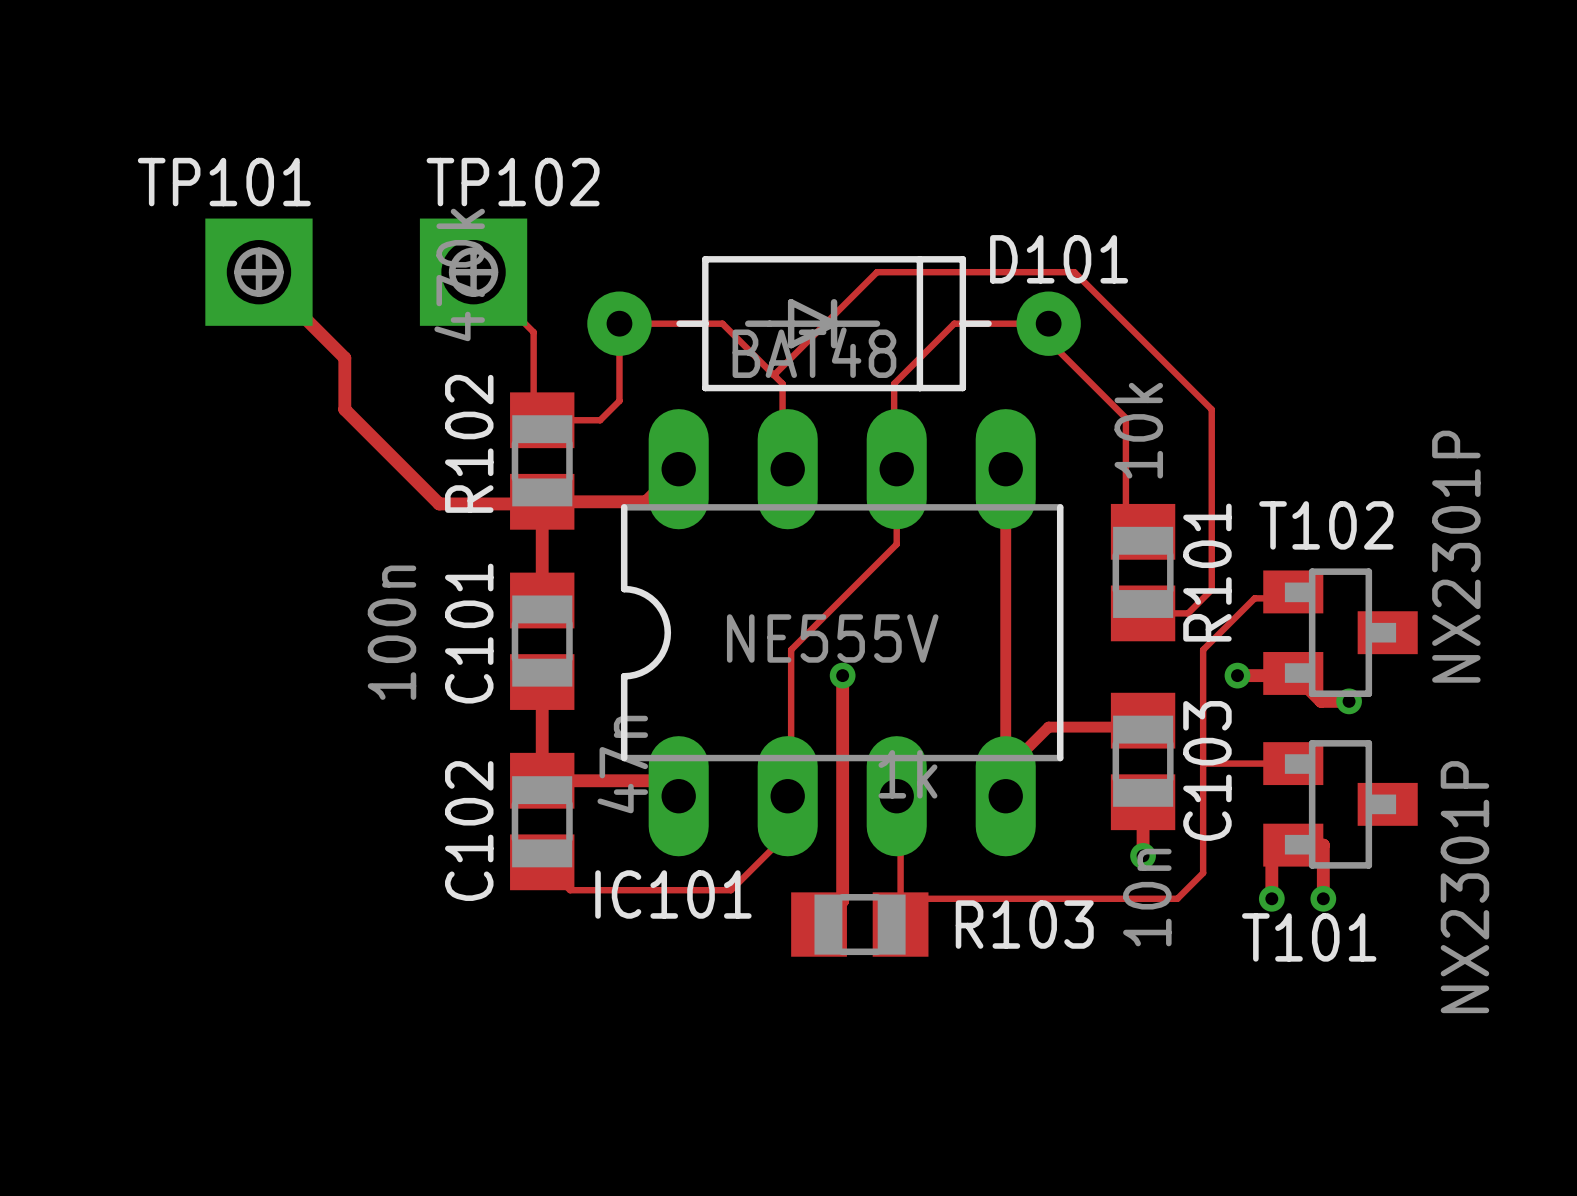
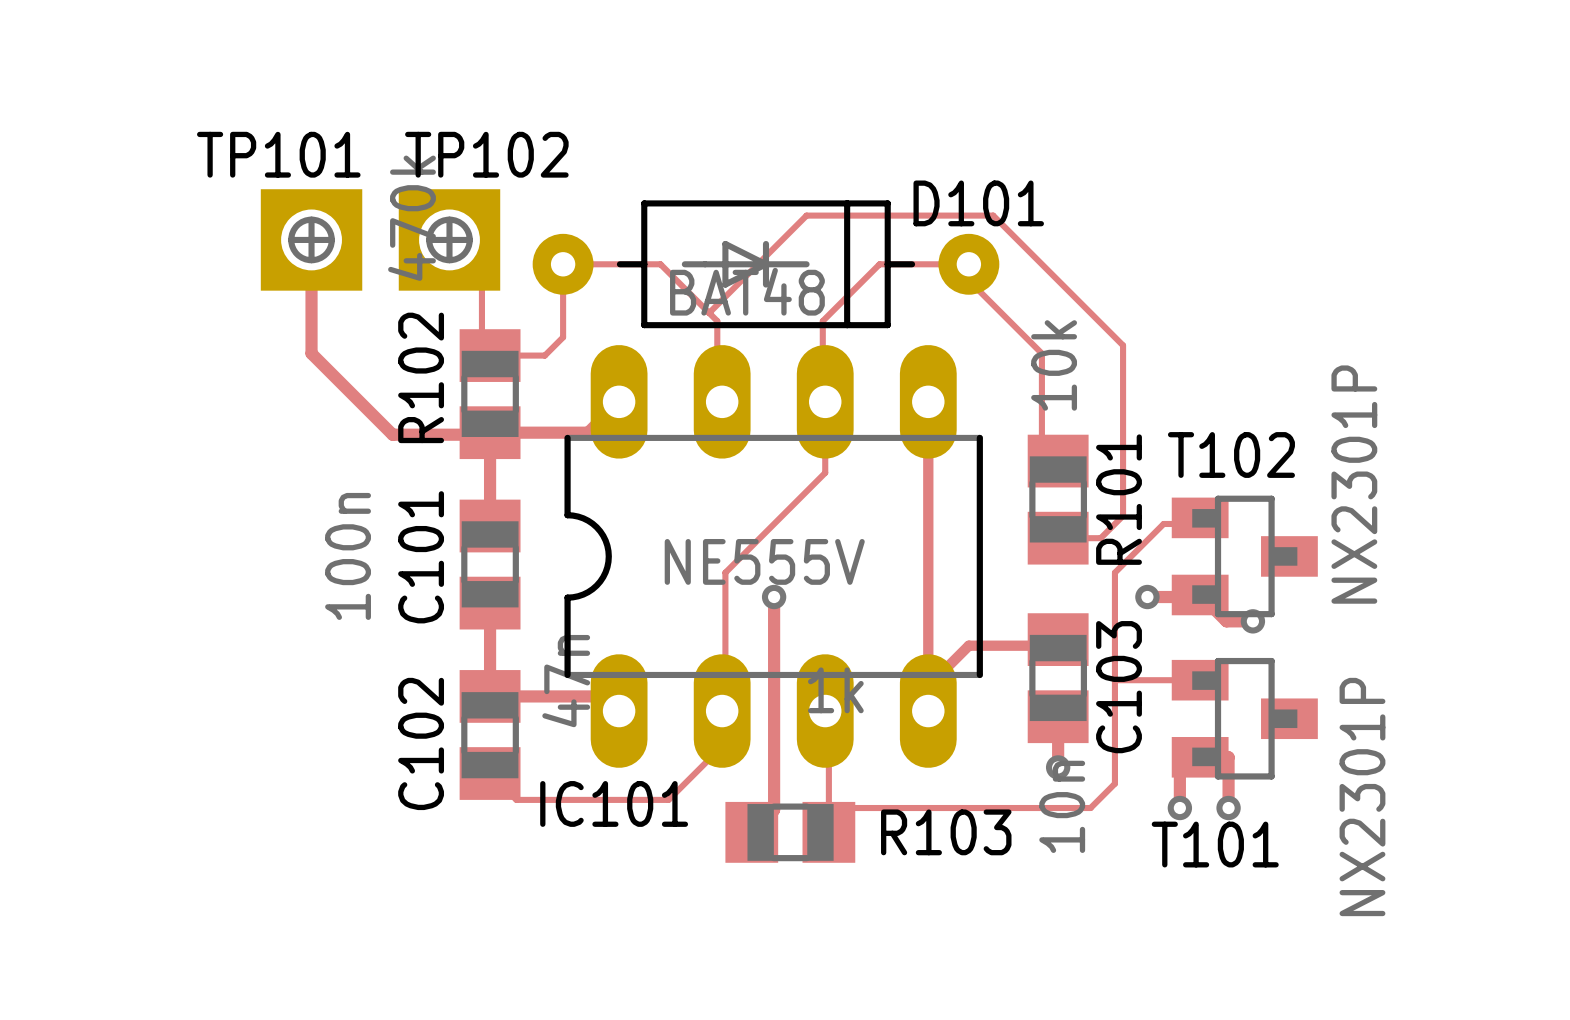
track: (258, 272) (344, 358) (344, 409) (353, 418) -> (311, 239) (311, 353)
TP101 position: (258, 272) -> (311, 239)
TP102 position: (473, 272) -> (449, 239)

